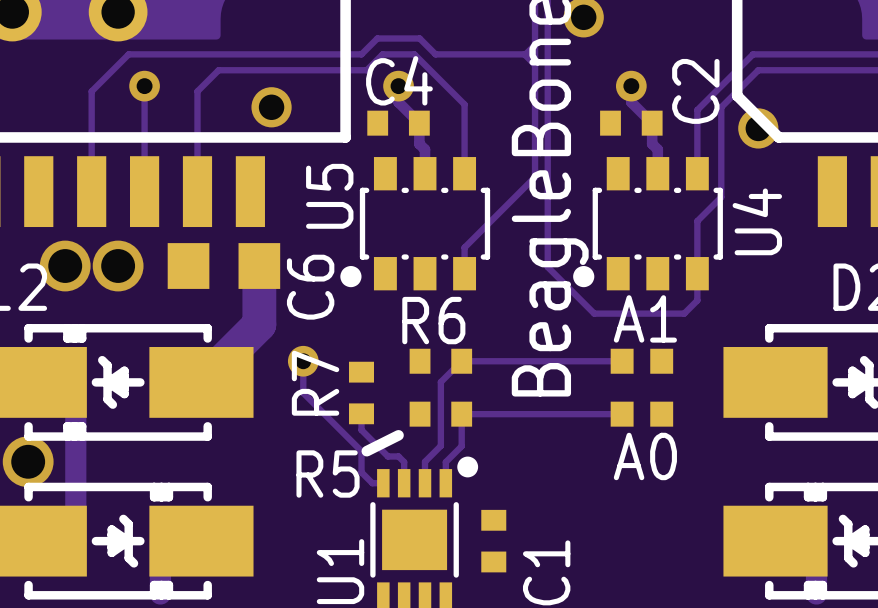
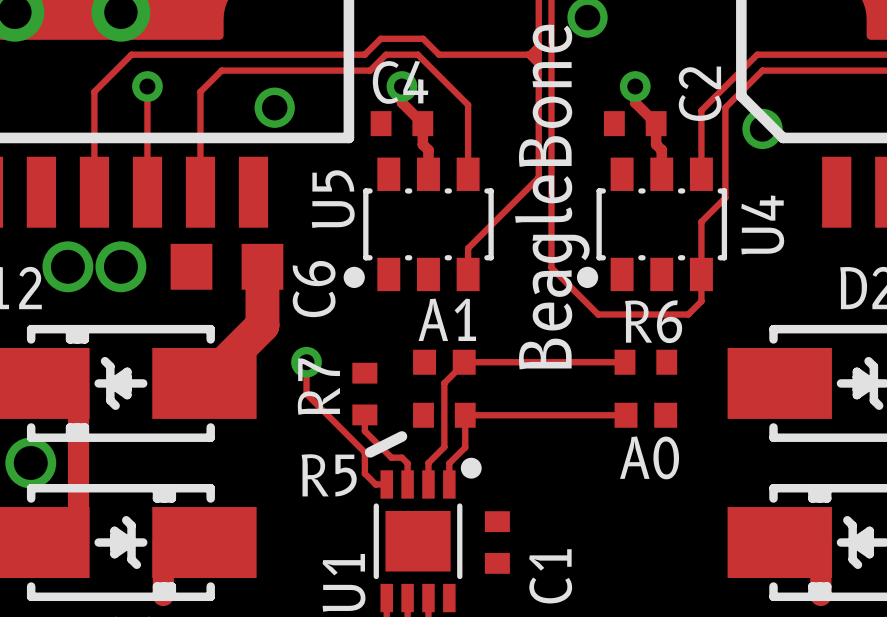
text position: A1 (645, 318) -> A1 (447, 319)
R6 name position: R6 (433, 320) -> R6 (653, 321)
R6 position: (440, 361) -> (645, 362)
part position: (641, 361) -> (444, 362)

